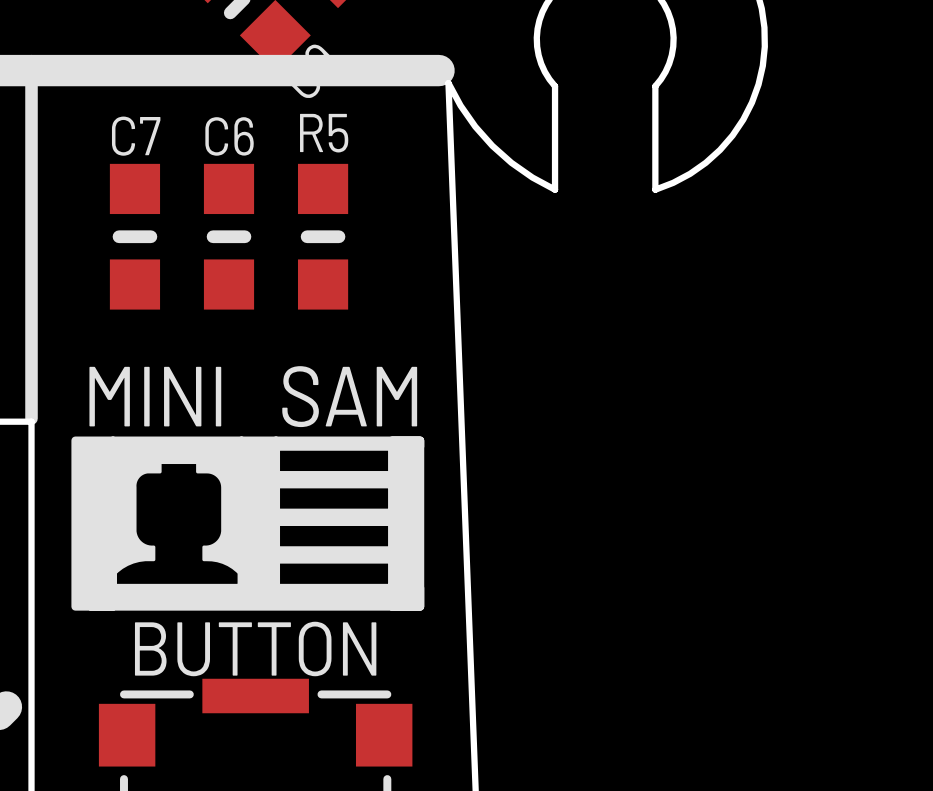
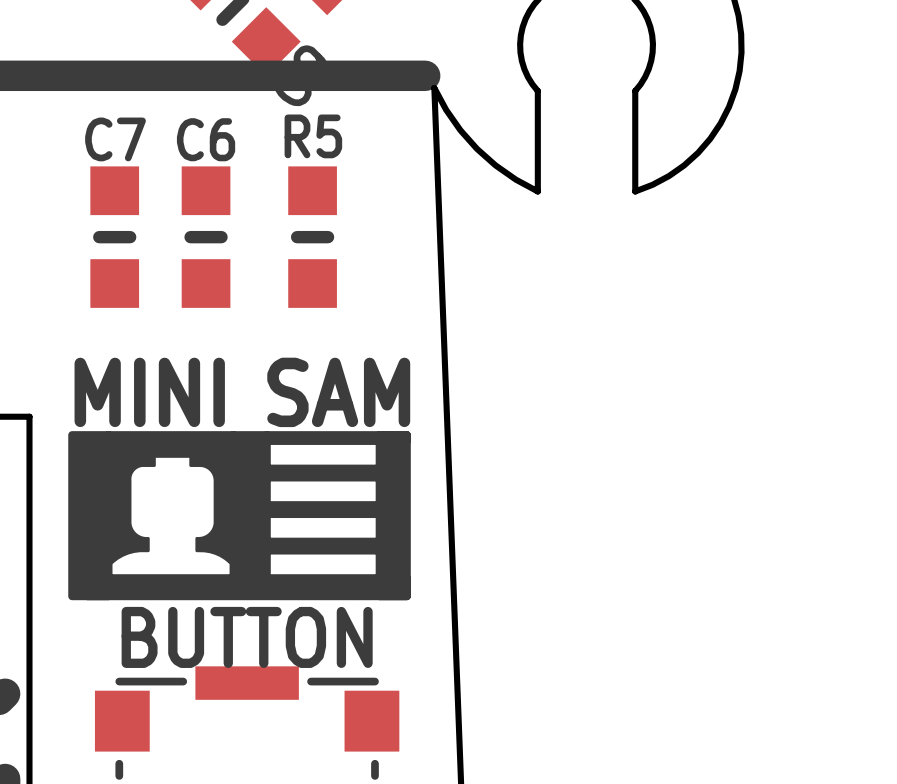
line: (31, 61) (31, 418) -> none
C7 position: (134, 236) -> (114, 237)
C6 position: (229, 236) -> (206, 237)

